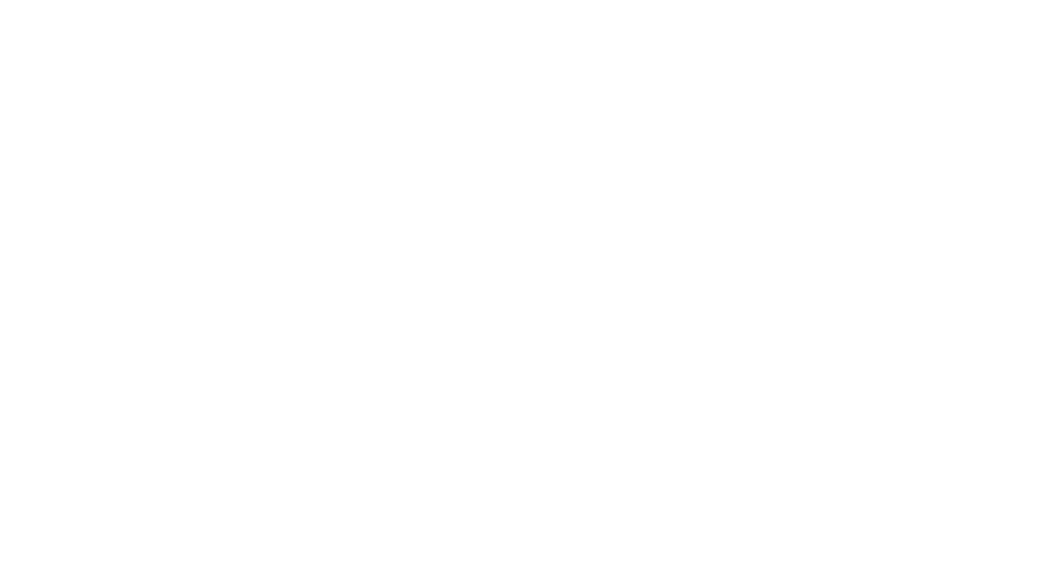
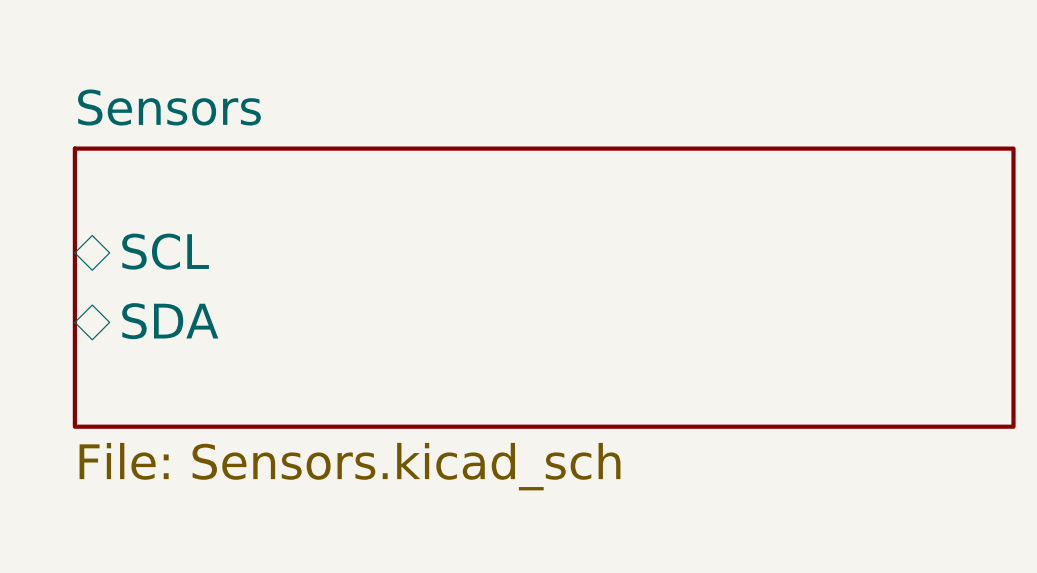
sheet pin: none -> SCL (165, 251)
sheet Sensors: none -> File: Sensors.kicad_sch (544, 287)
sheet pin: none -> SDA (170, 321)

